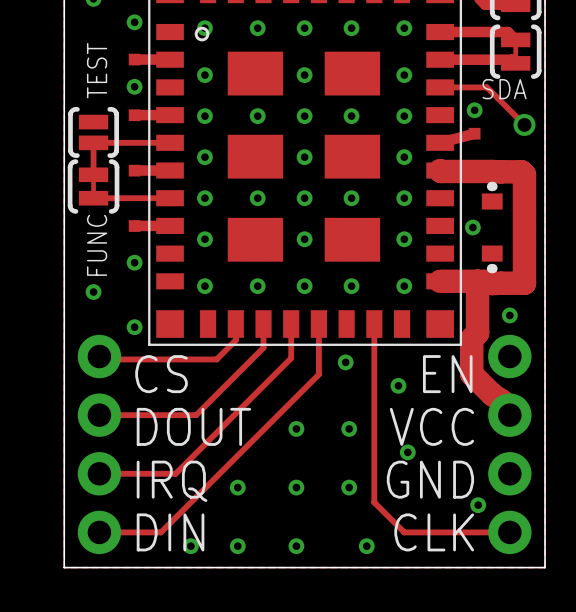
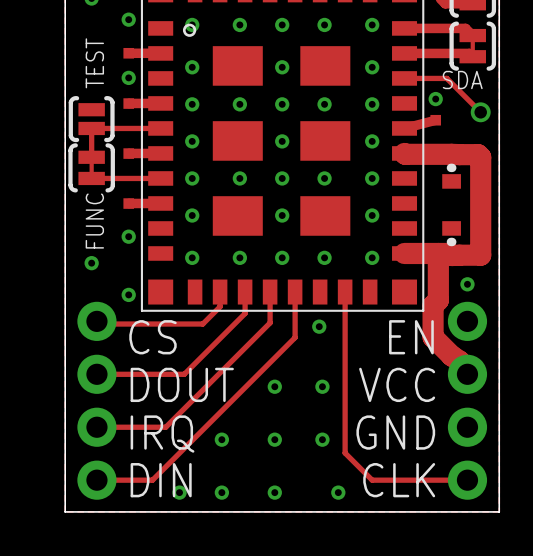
via: (472, 227) -> none
via: (398, 385) -> none
via: (407, 452) -> none
via: (478, 505) -> none

